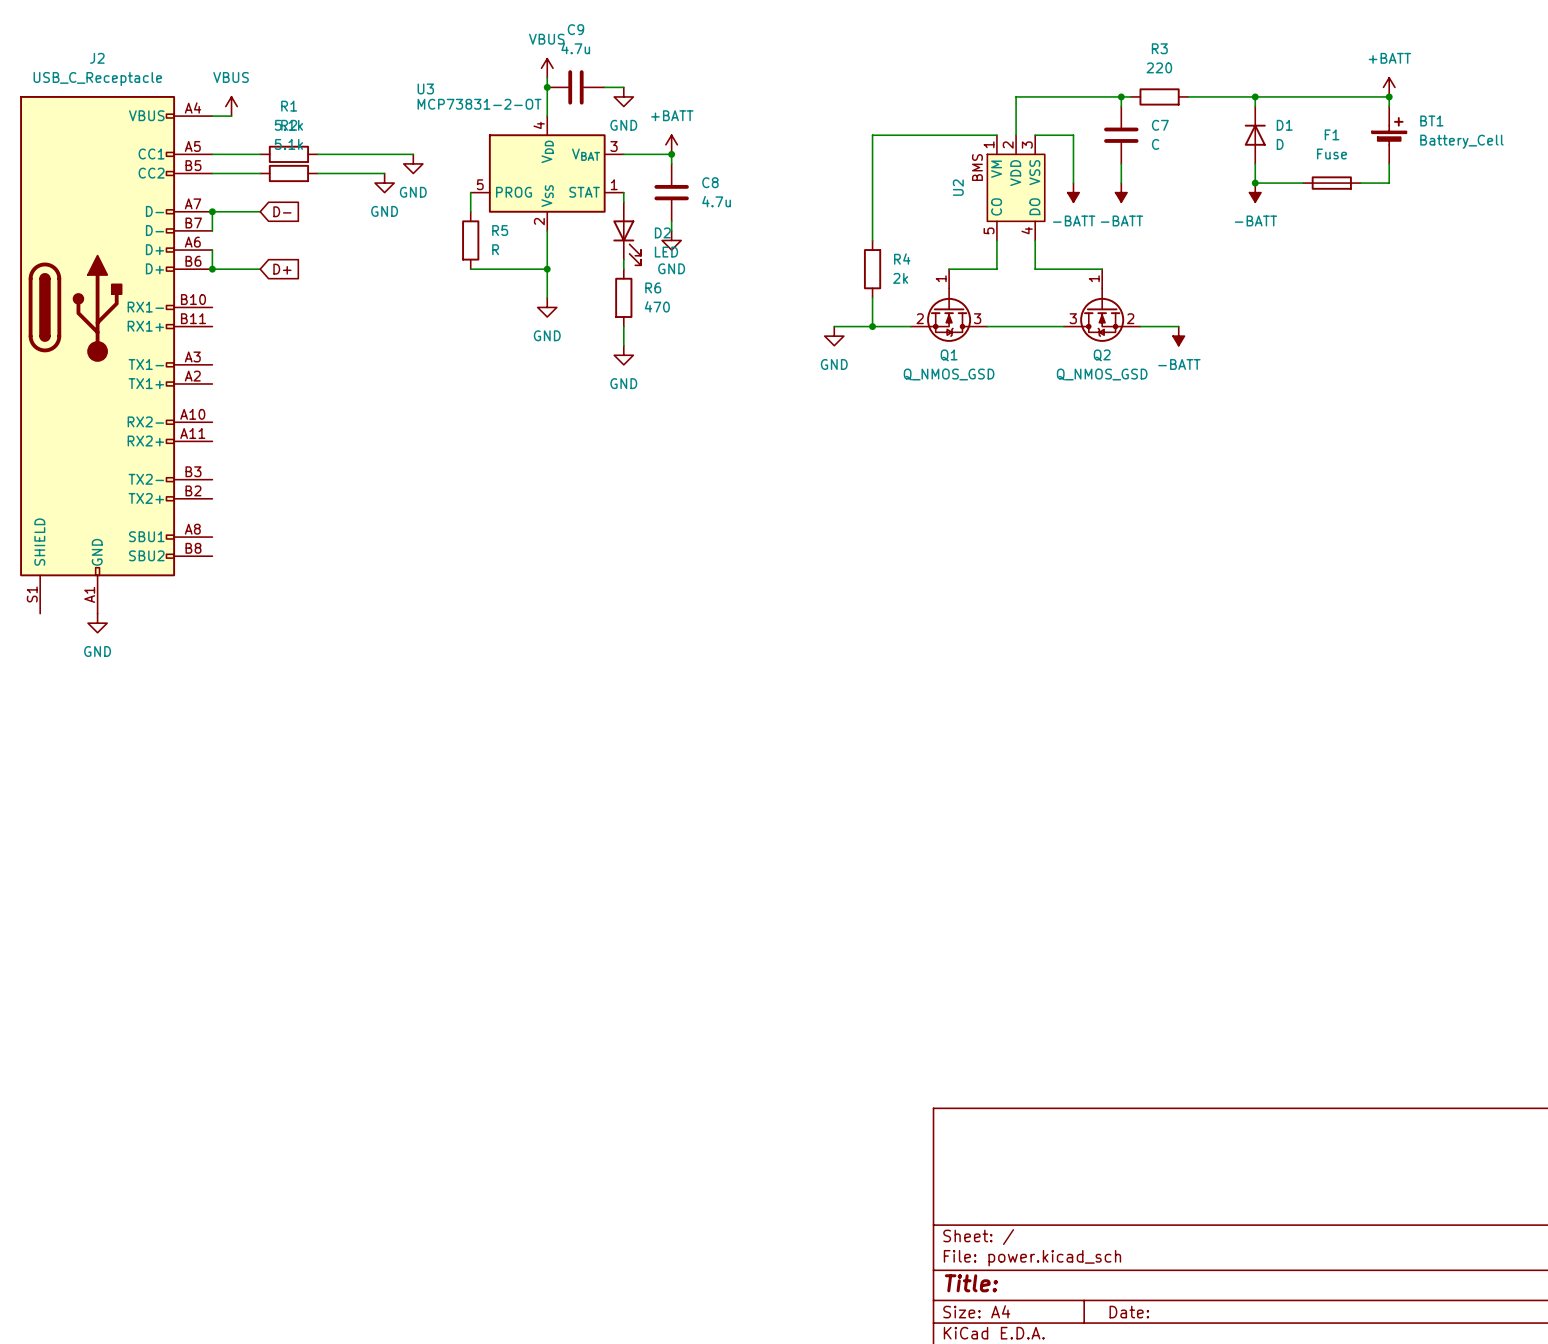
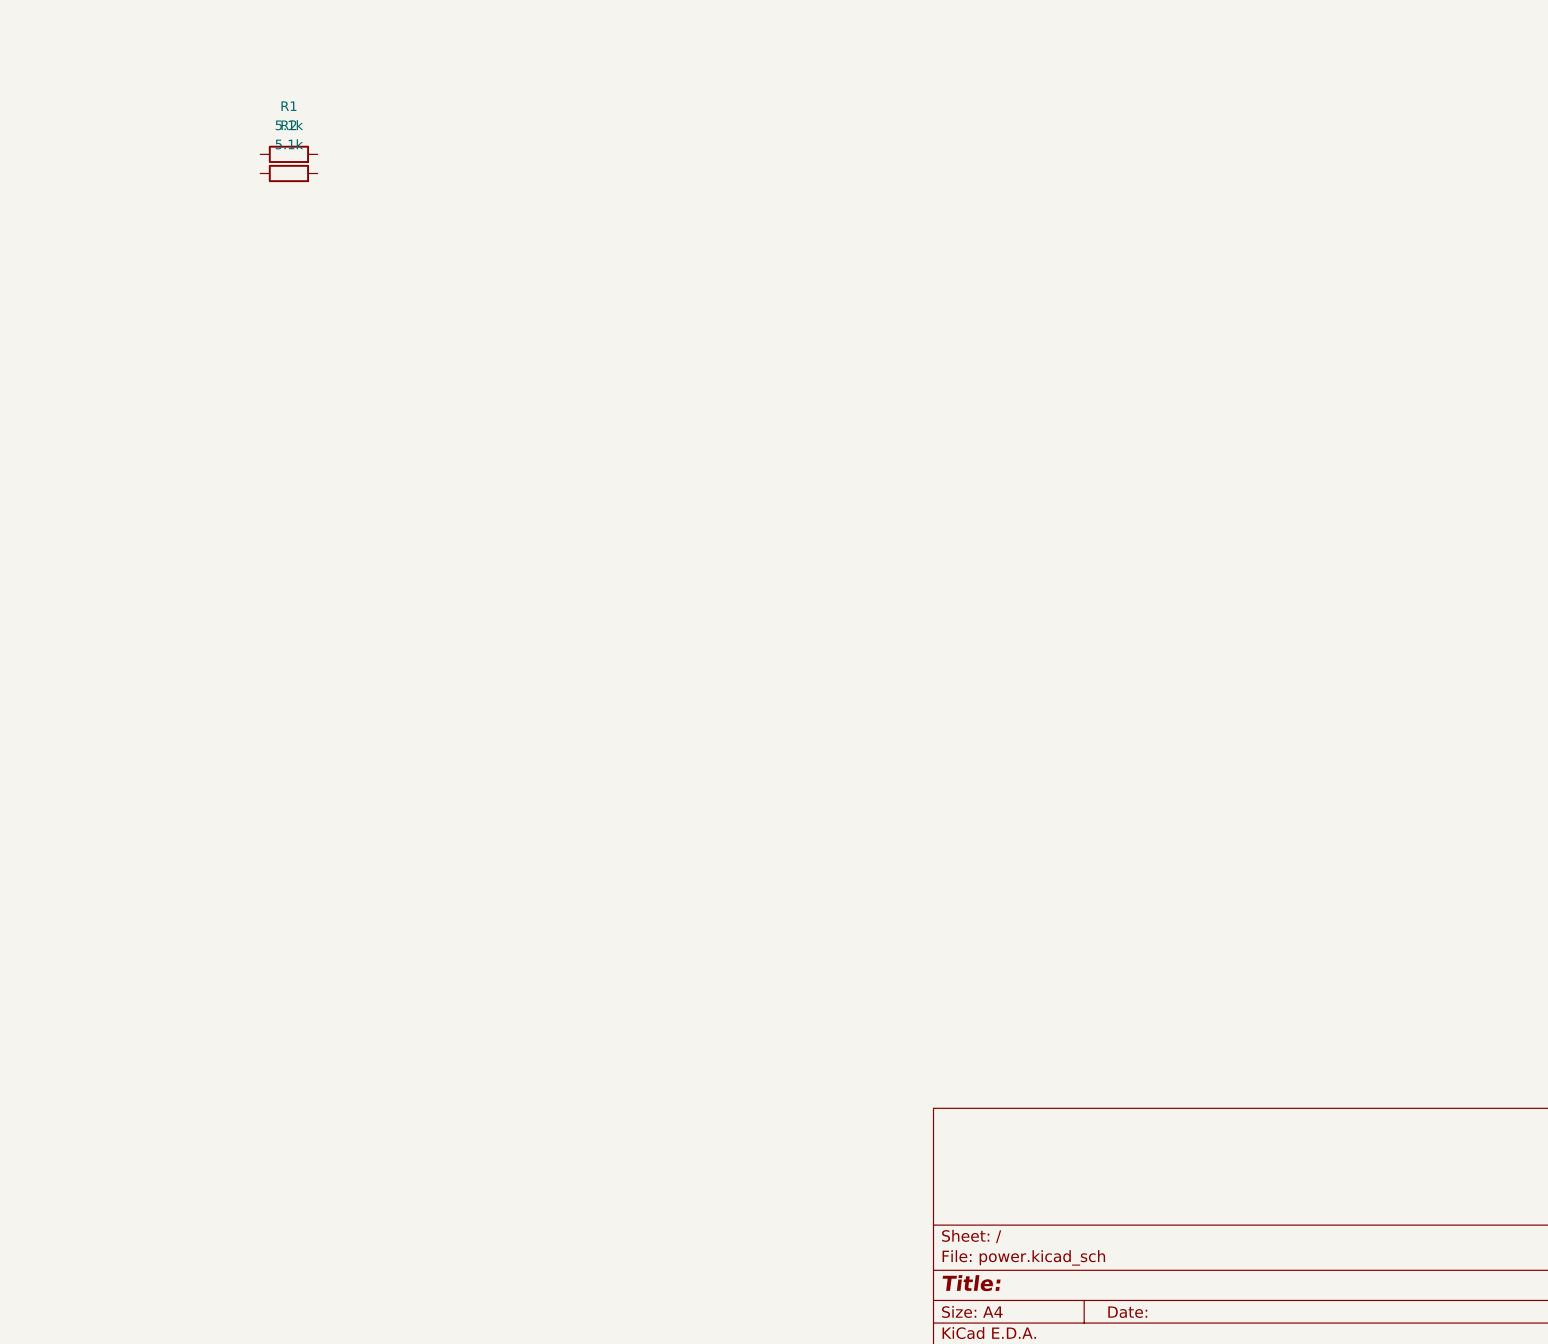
power symbol: VBUS (547, 68) -> none
wire: (547, 77) (547, 116) -> none
junction: (547, 87) -> none
C9: 4.7u (575, 87) -> none
wire: (604, 87) (623, 87) -> none
power symbol: +BATT (1389, 87) -> none
power symbol: GND (623, 96) -> none
wire: (1121, 96) (1121, 106) -> none
junction: (1121, 96) -> none
wire: (1130, 96) (1016, 96) (1016, 135) -> none
R3: 220 (1159, 96) -> none
wire: (1188, 96) (1389, 96) (1389, 106) -> none
wire: (1255, 96) (1255, 106) -> none
junction: (1255, 96) -> none
junction: (1389, 96) -> none
power symbol: VBUS (231, 106) -> none
wire: (212, 116) (231, 116) -> none
wire: (996, 135) (872, 135) (872, 240) -> none
wire: (1035, 135) (1073, 135) (1073, 183) -> none
C7: C (1121, 135) -> none
D1: D (1255, 135) -> none
BT1: Battery_Cell (1389, 135) -> none
power symbol: +BATT (671, 144) -> none
wire: (212, 154) (260, 154) -> none
wire: (317, 154) (413, 154) -> none
wire: (623, 154) (671, 154) (671, 163) -> none
junction: (671, 154) -> none
power symbol: GND (413, 163) -> none
wire: (1121, 163) (1121, 183) -> none
wire: (1255, 163) (1255, 183) (1303, 183) -> none
wire: (1389, 163) (1389, 183) (1360, 183) -> none
wire: (212, 173) (260, 173) -> none
wire: (317, 173) (384, 173) -> none
U3: MCP73831-2-OT (547, 173) -> none
power symbol: GND (384, 183) -> none
junction: (1255, 183) -> none
F1: Fuse (1331, 183) -> none
U2: (1016, 187) -> none
wire: (470, 192) (470, 211) -> none
wire: (623, 192) (623, 202) -> none
C8: 4.7u (671, 192) -> none
power symbol: -BATT (1073, 192) -> none
power symbol: -BATT (1121, 192) -> none
power symbol: -BATT (1255, 192) -> none
junction: (212, 211) -> none
wire: (260, 211) (212, 211) (212, 230) -> none
global label: D- (282, 211) -> none
wire: (671, 221) (671, 230) -> none
wire: (547, 230) (547, 297) -> none
D2: LED (627, 233) -> none
R5: R (470, 240) -> none
power symbol: GND (671, 240) -> none
wire: (996, 240) (996, 269) (949, 269) -> none
wire: (1035, 240) (1035, 269) (1102, 269) -> none
wire: (212, 250) (212, 269) (260, 269) -> none
wire: (623, 259) (623, 269) -> none
junction: (212, 269) -> none
global label: D+ (282, 269) -> none
wire: (470, 269) (547, 269) -> none
junction: (547, 269) -> none
R4: 2k (872, 269) -> none
R6: 470 (623, 297) -> none
wire: (872, 297) (872, 326) -> none
Q1: Q_NMOS_GSD (949, 305) -> none
Q2: Q_NMOS_GSD (1102, 305) -> none
power symbol: GND (547, 307) -> none
wire: (623, 326) (623, 345) -> none
wire: (834, 326) (910, 326) -> none
junction: (872, 326) -> none
wire: (987, 326) (1063, 326) -> none
wire: (1140, 326) (1178, 326) -> none
power symbol: GND (834, 336) -> none
power symbol: -BATT (1178, 336) -> none
J2: USB_C_Receptacle (116, 354) -> none
power symbol: GND (623, 355) -> none
power symbol: GND (97, 623) -> none

